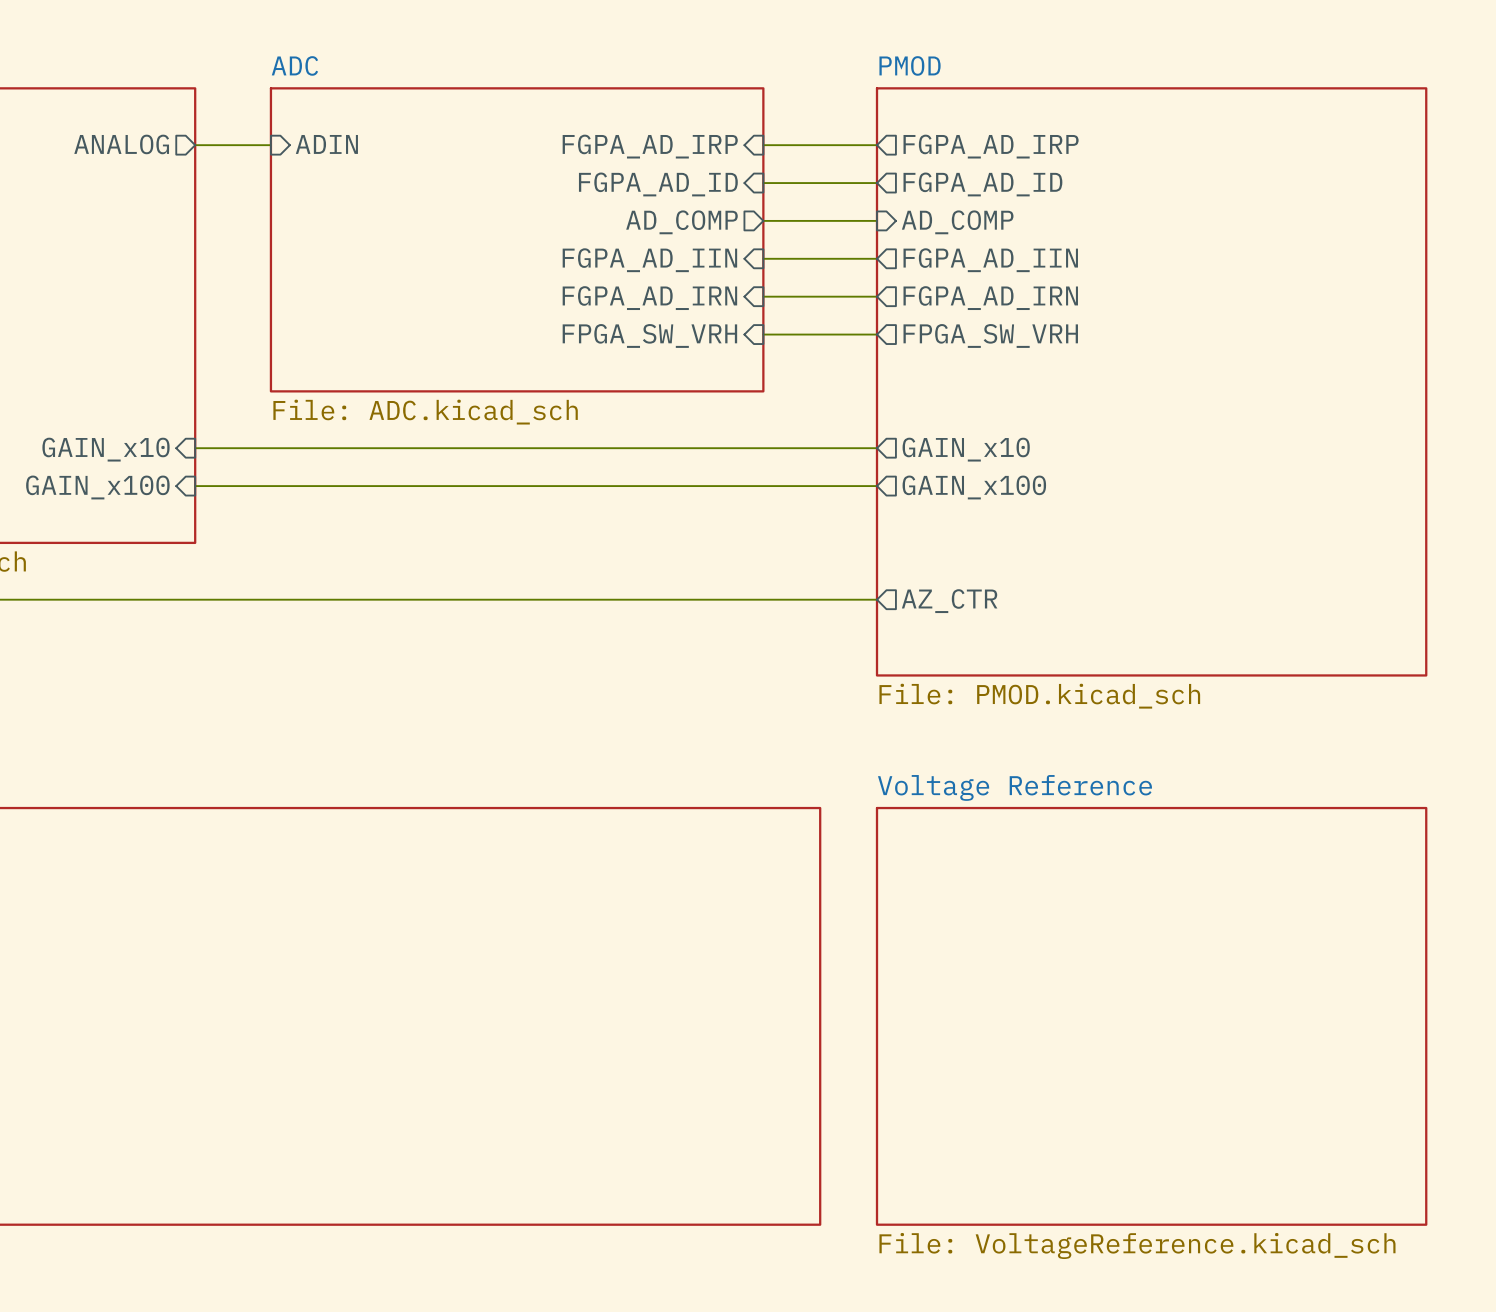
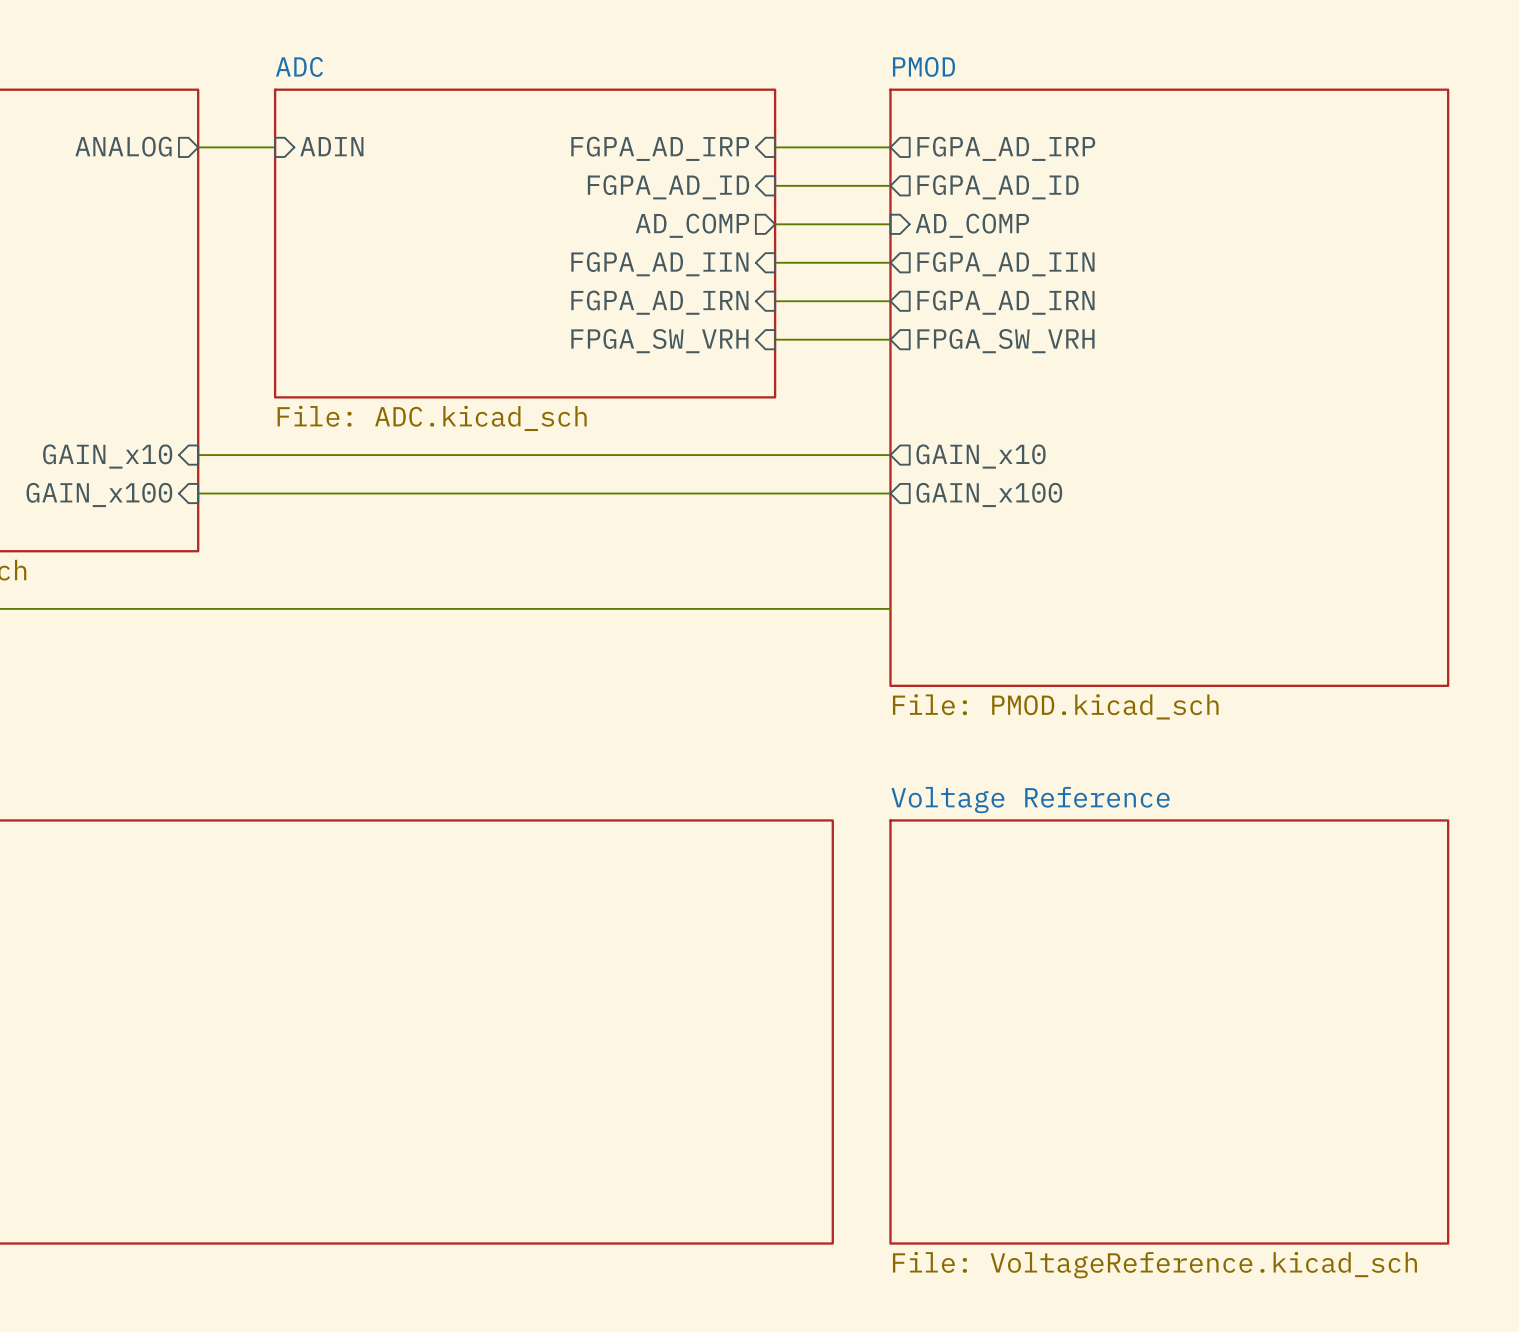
sheet pin: AZ_CTR (949, 601) -> none

